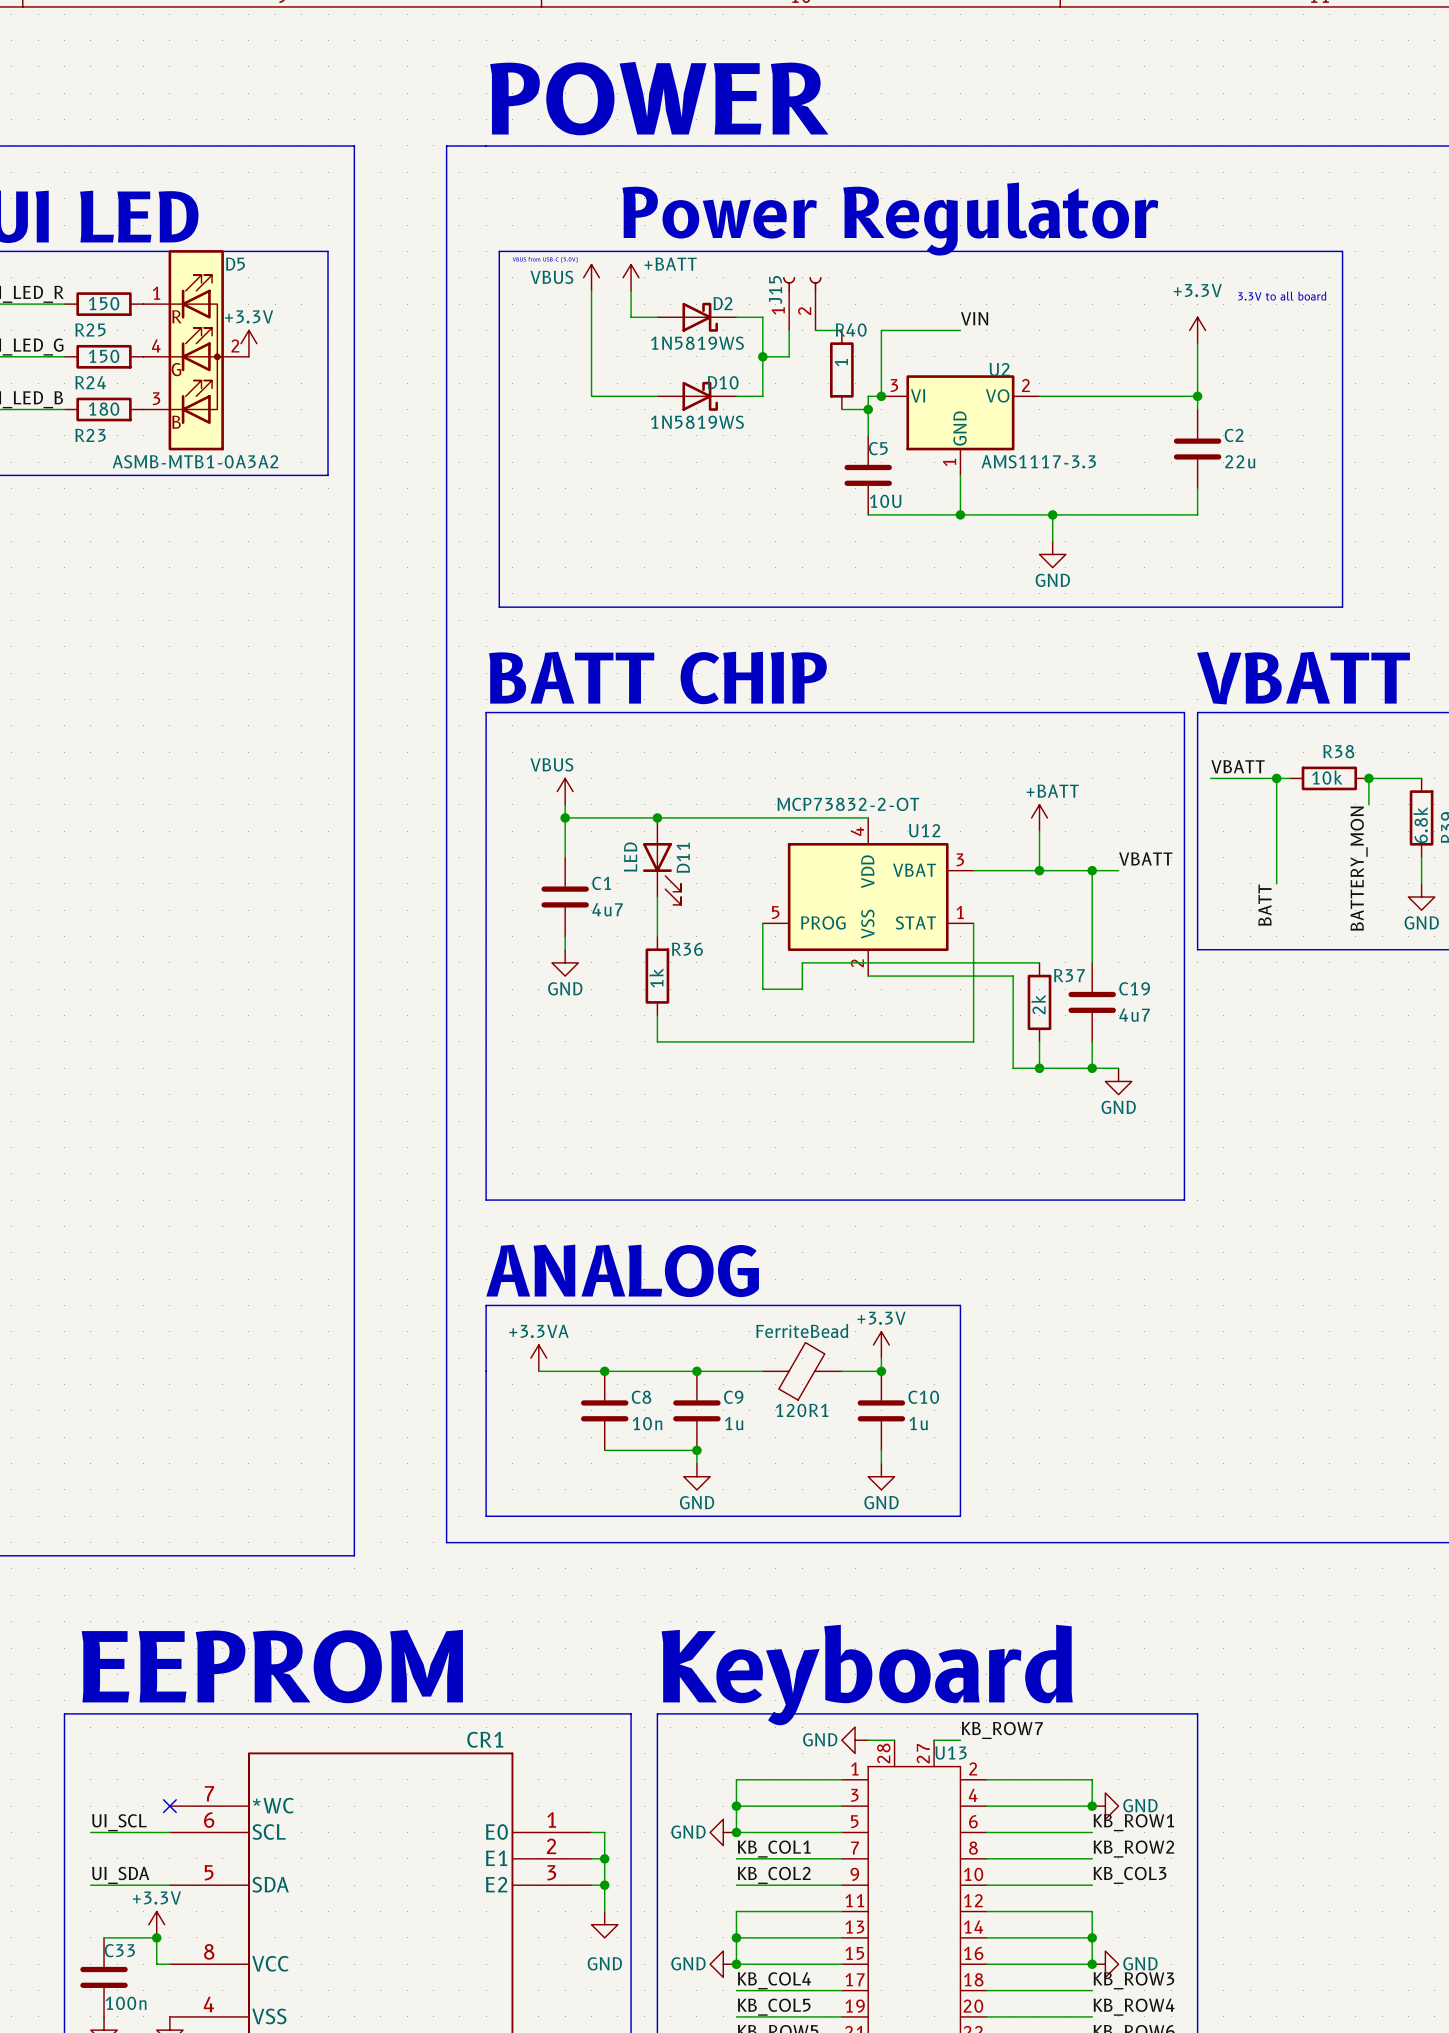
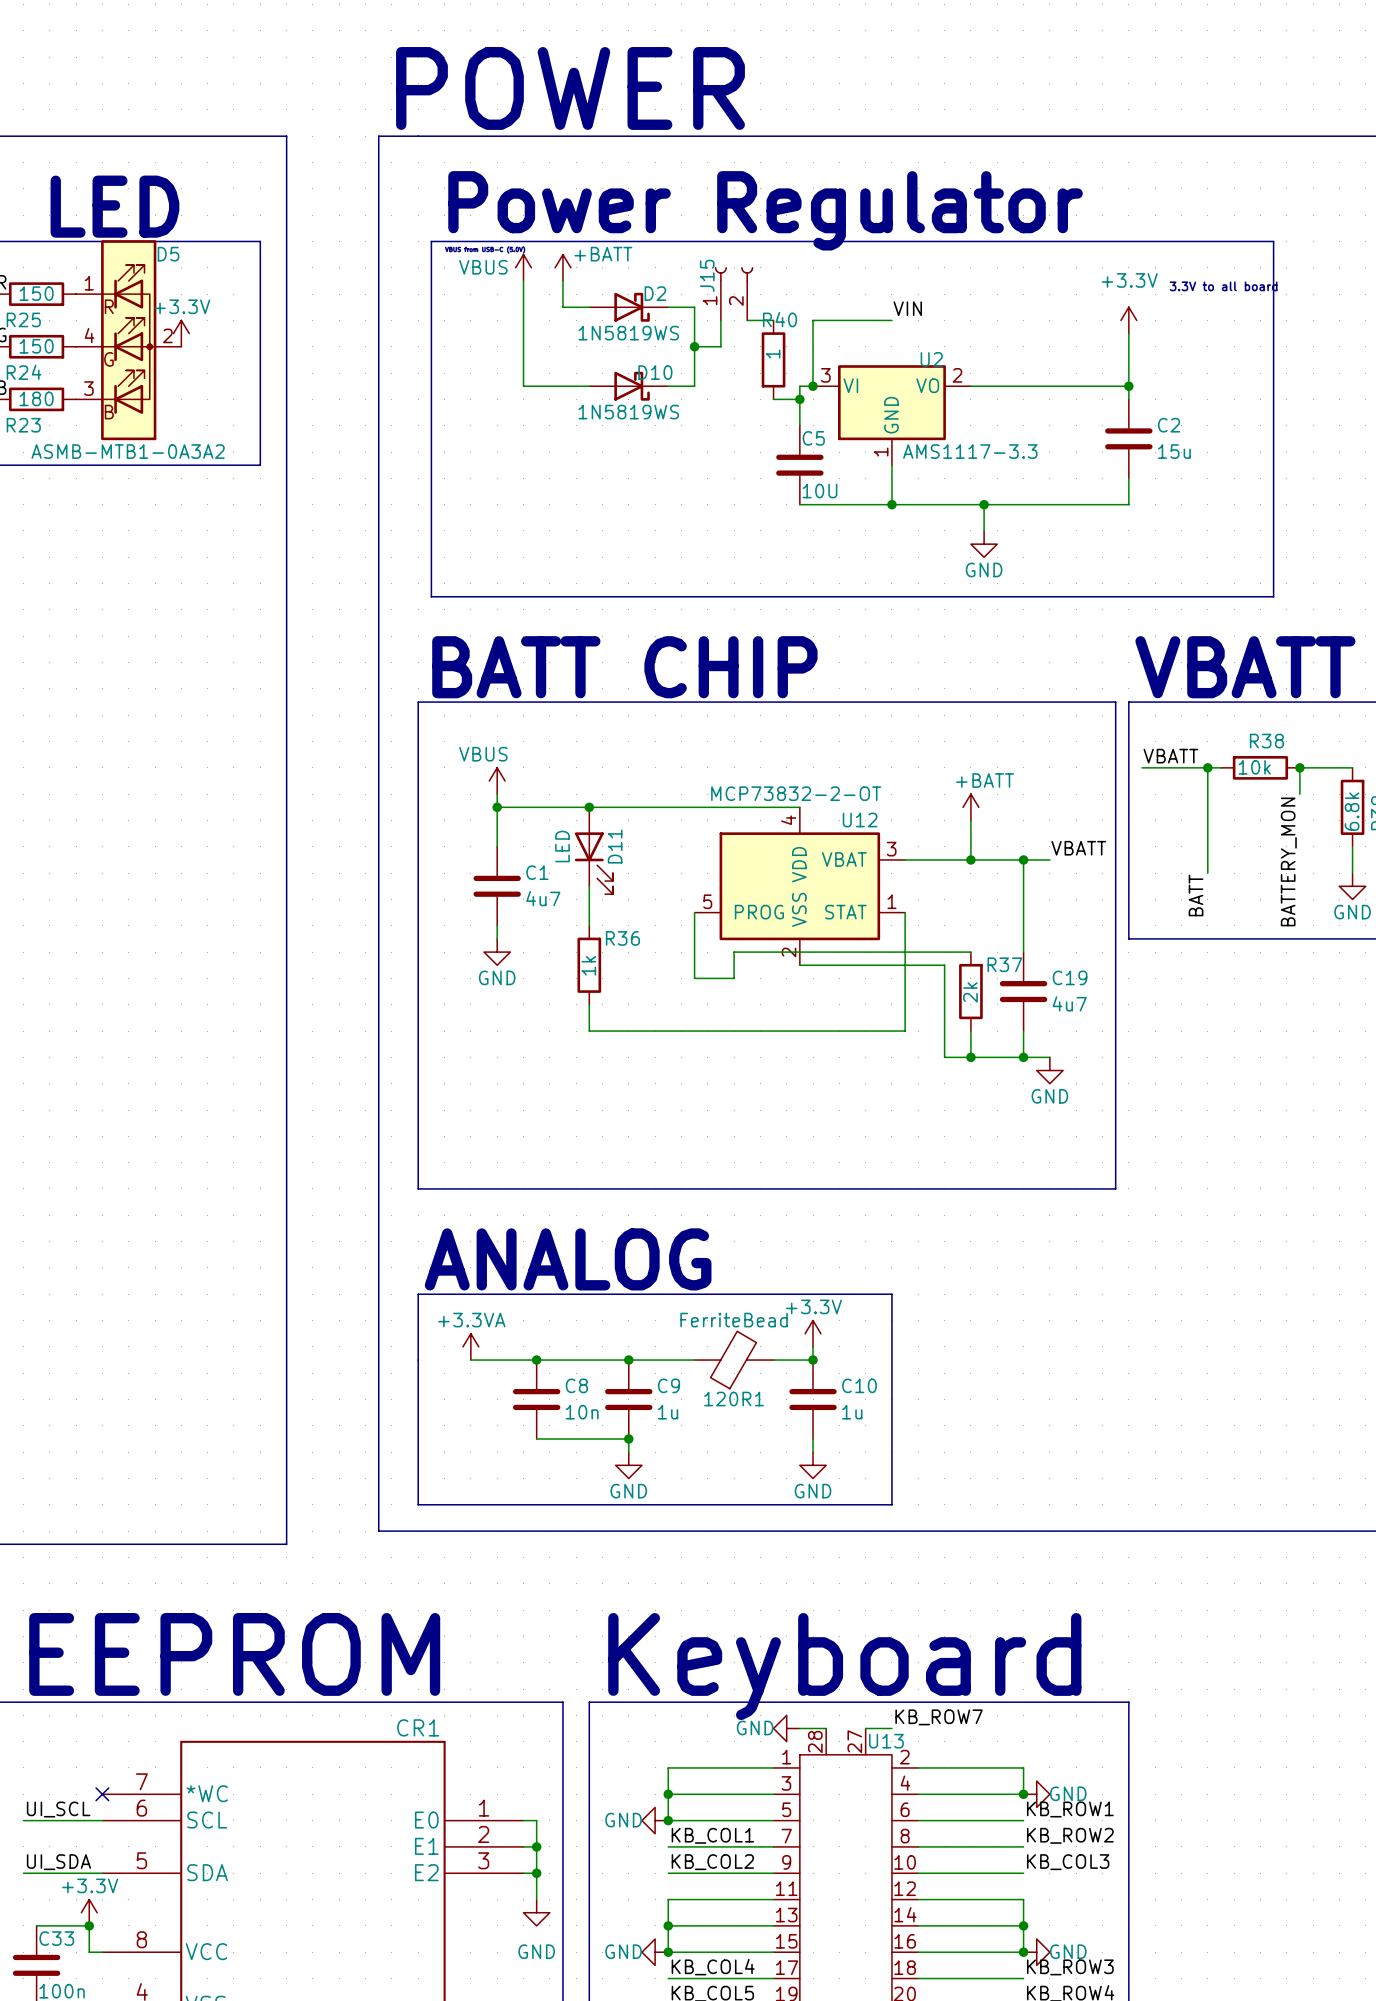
C2 value: 22u (1240, 461) -> 15u (1174, 451)

